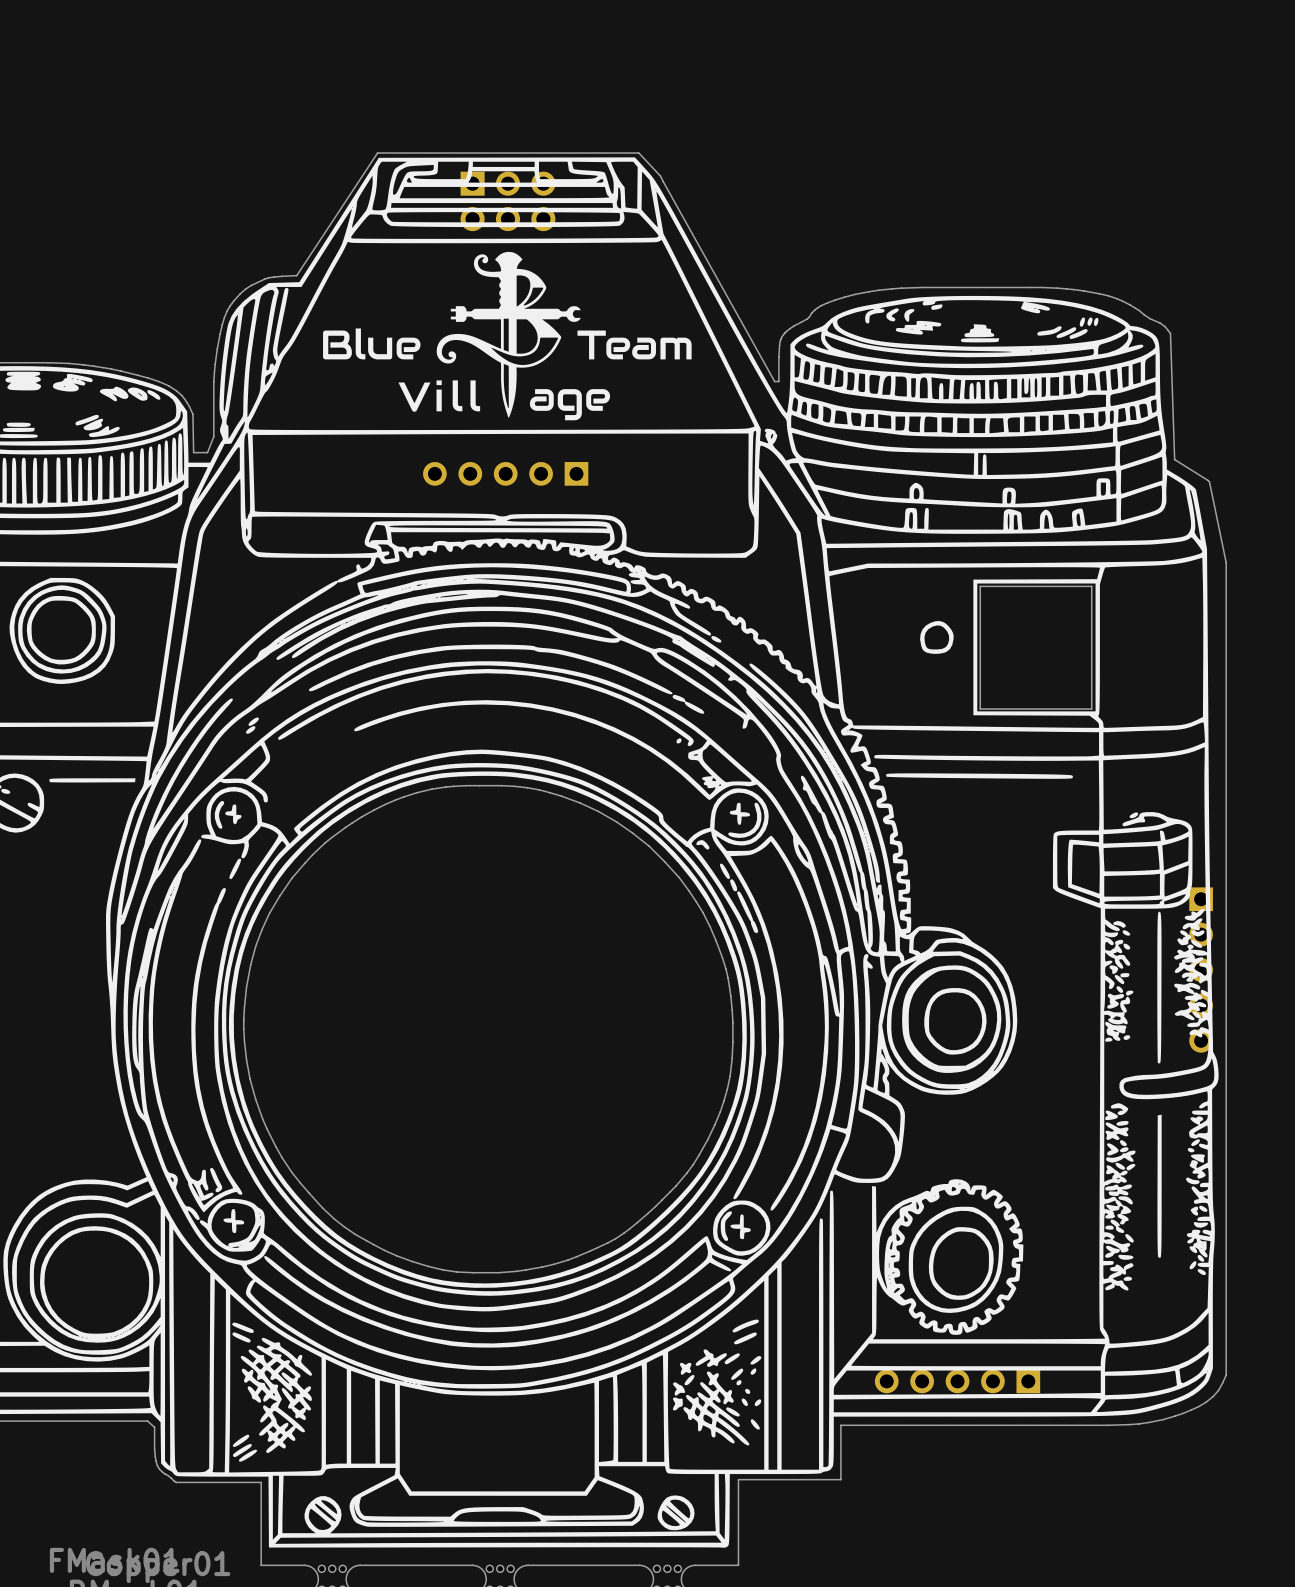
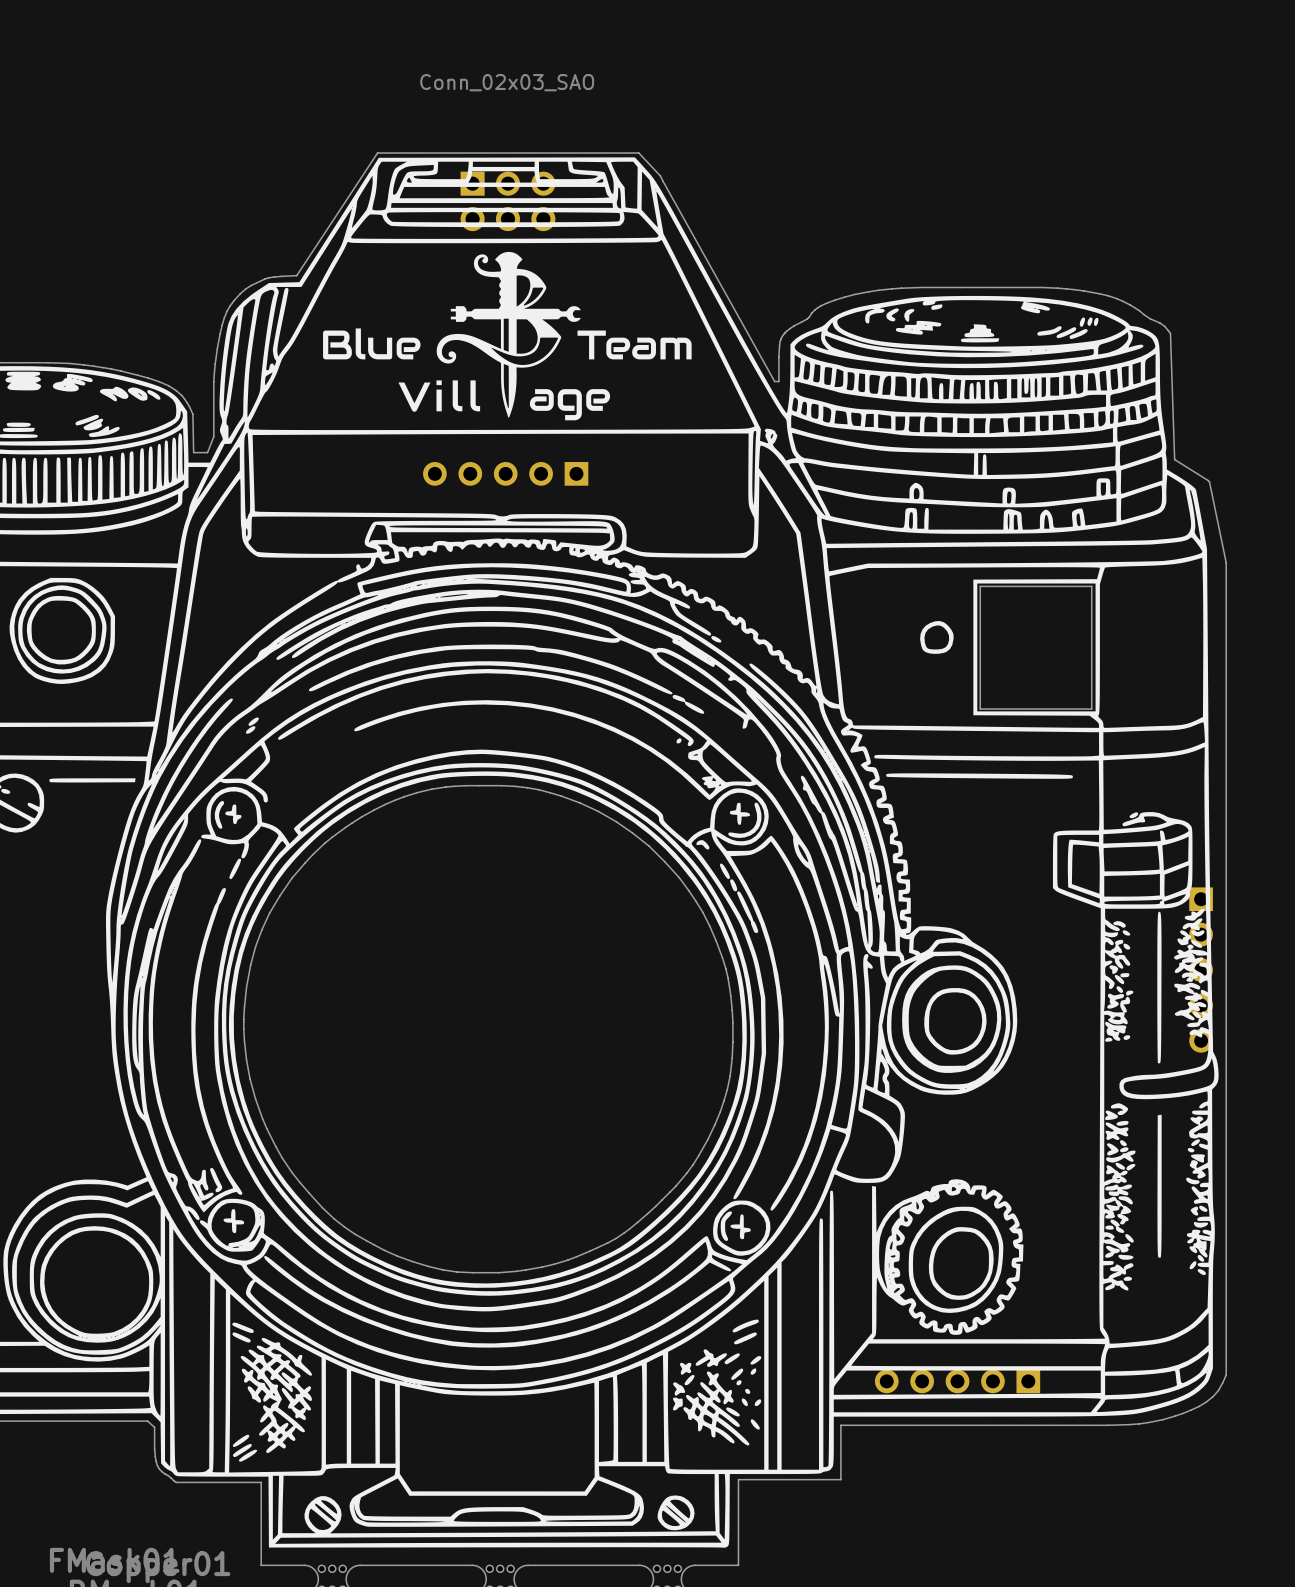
part value: none -> Conn_02x03_SAO (507, 82)

